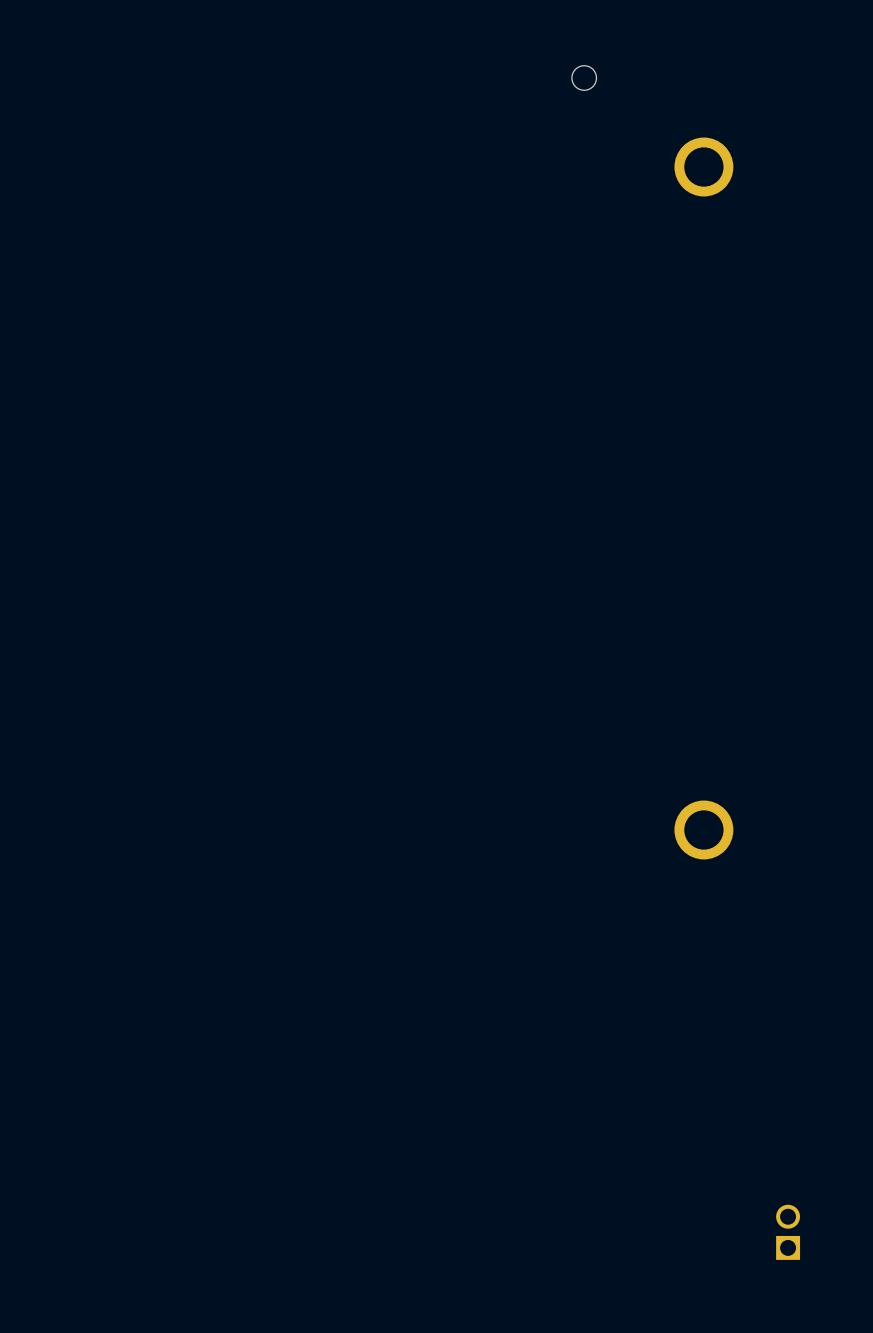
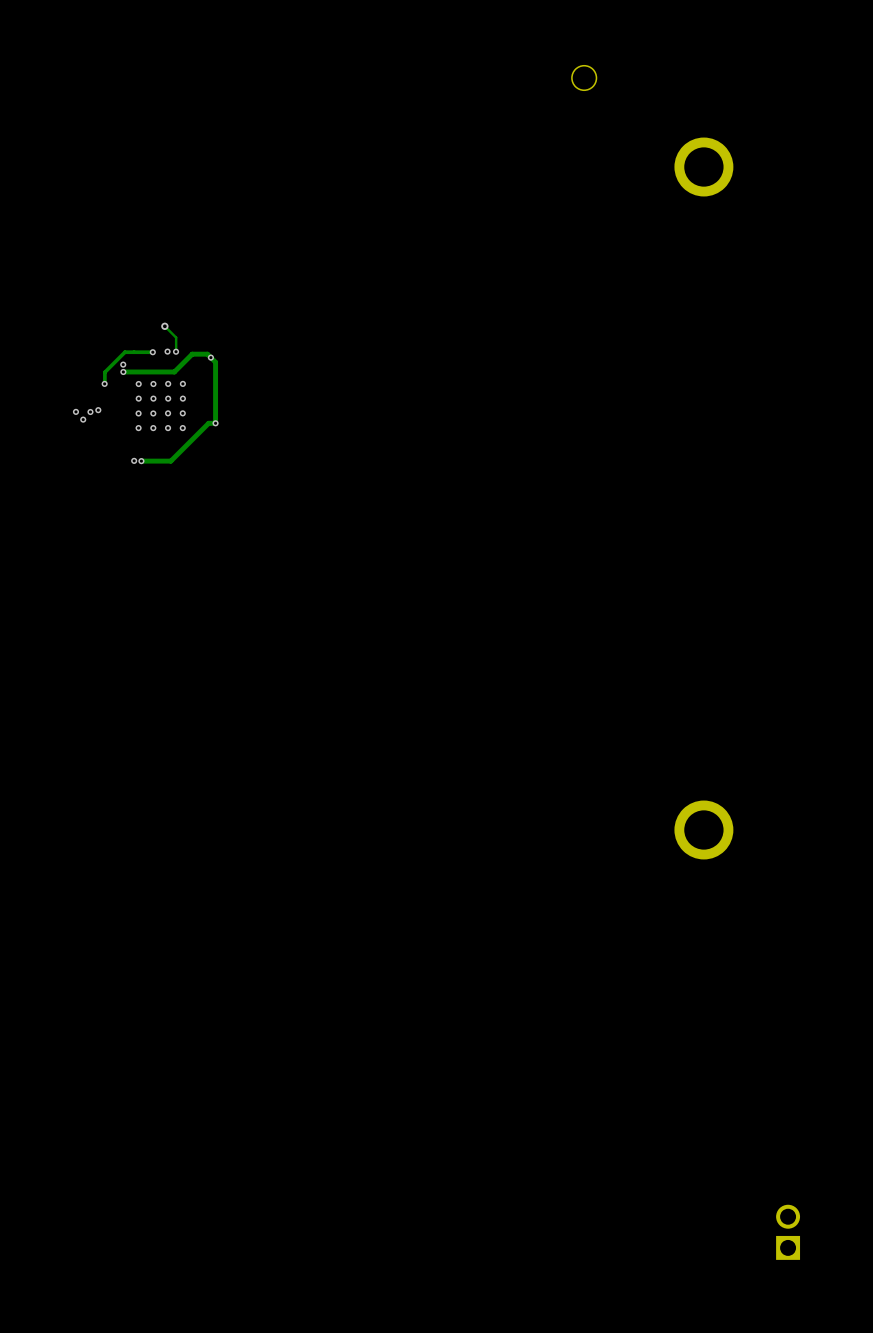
track: none -> (164, 326) (176, 337) (176, 350)
via: none -> (164, 326)
via: none -> (167, 351)
via: none -> (176, 351)
track: none -> (152, 352) (124, 352) (104, 372) (104, 383)
via: none -> (152, 352)
via: none -> (210, 357)
via: none -> (123, 364)
track: none -> (123, 371) (174, 371) (192, 354) (207, 354) (215, 362) (215, 423) (208, 423) (170, 461) (141, 461)
via: none -> (123, 371)
via: none -> (104, 383)
via: none -> (168, 383)
via: none -> (182, 383)
via: none -> (138, 384)
via: none -> (153, 384)
via: none -> (138, 398)
via: none -> (153, 398)
via: none -> (168, 398)
via: none -> (182, 398)
via: none -> (98, 410)
via: none -> (75, 411)
via: none -> (90, 412)
via: none -> (138, 413)
via: none -> (153, 413)
via: none -> (168, 413)
via: none -> (182, 413)
via: none -> (83, 419)
via: none -> (215, 423)
via: none -> (138, 428)
via: none -> (153, 428)
via: none -> (168, 428)
via: none -> (182, 428)
via: none -> (134, 460)
via: none -> (141, 461)

